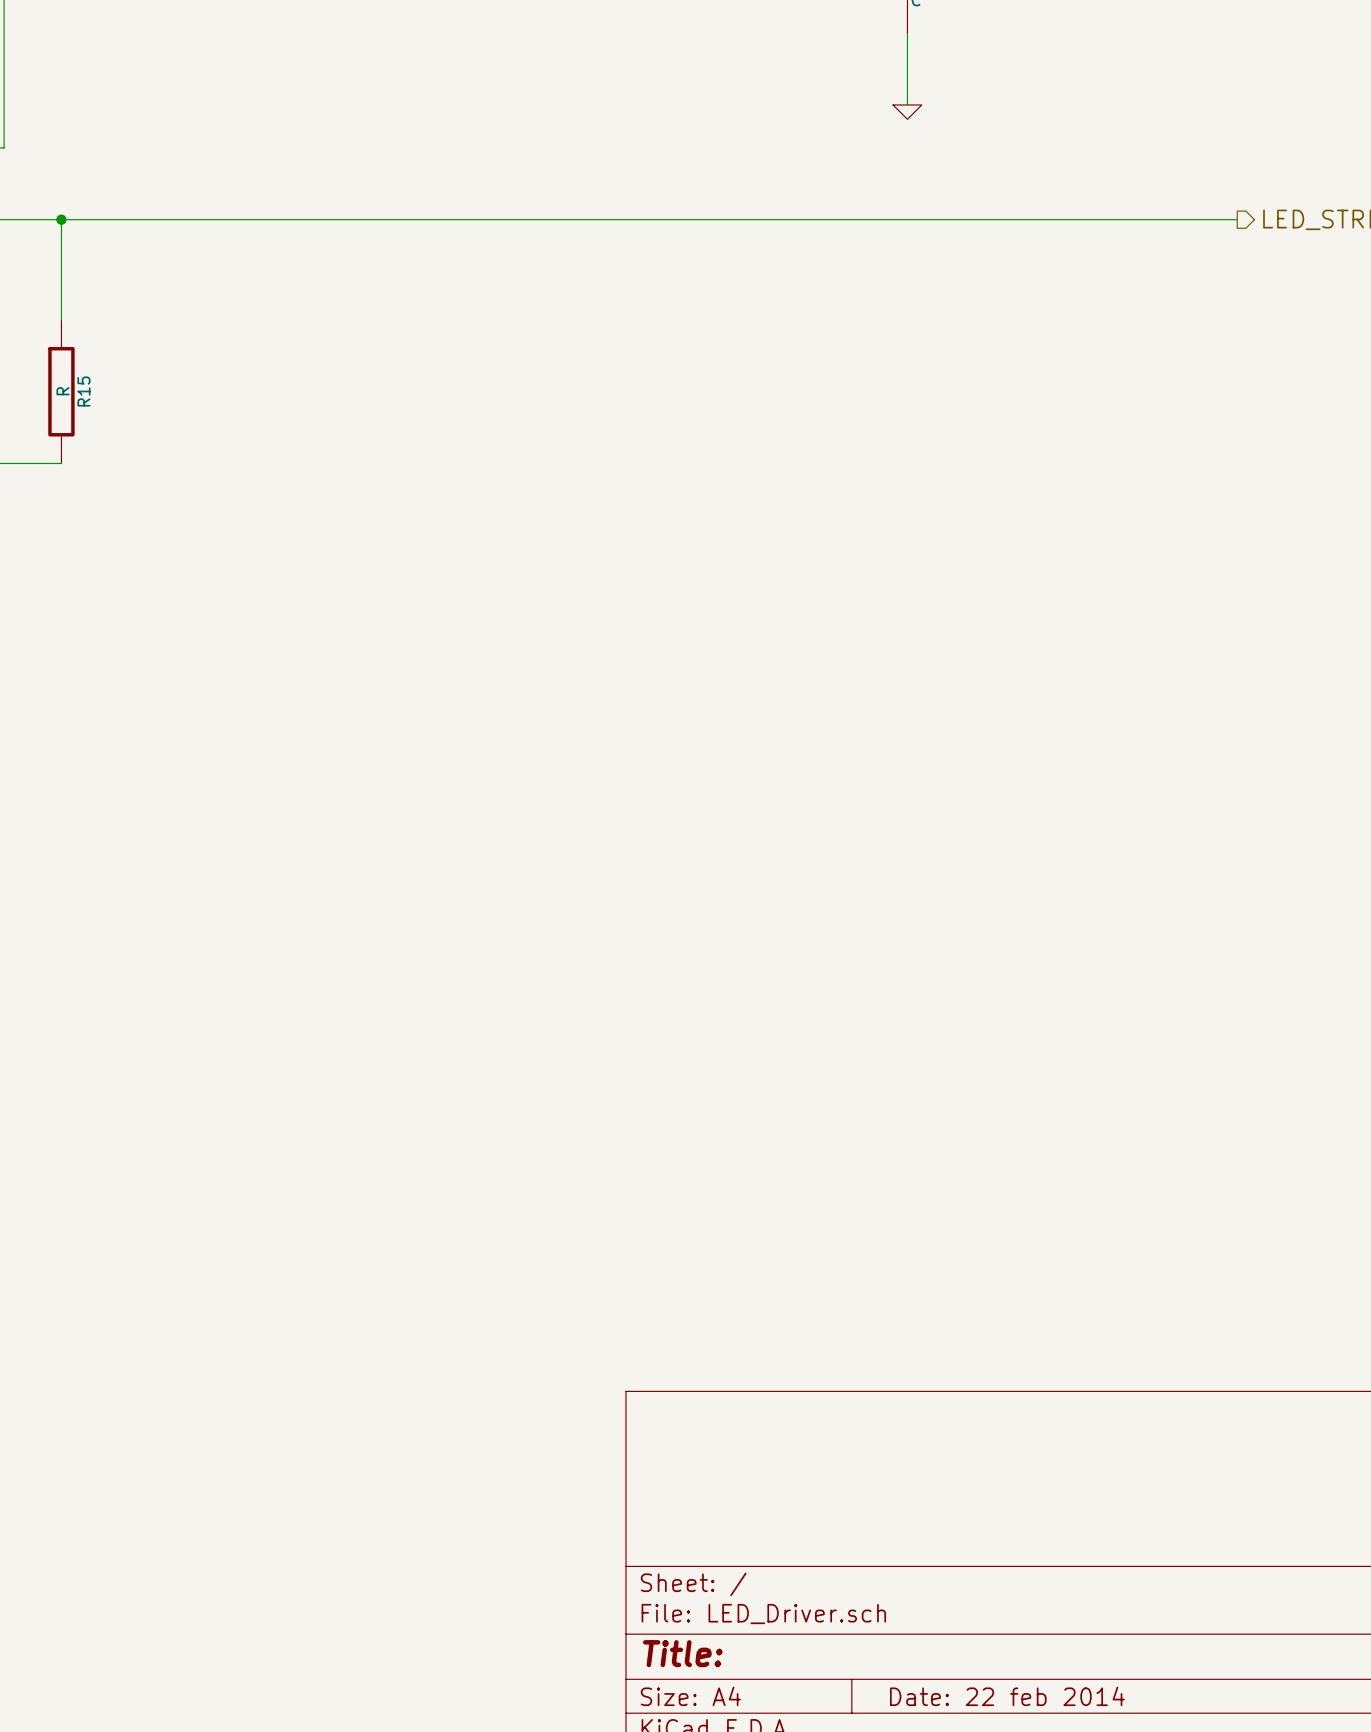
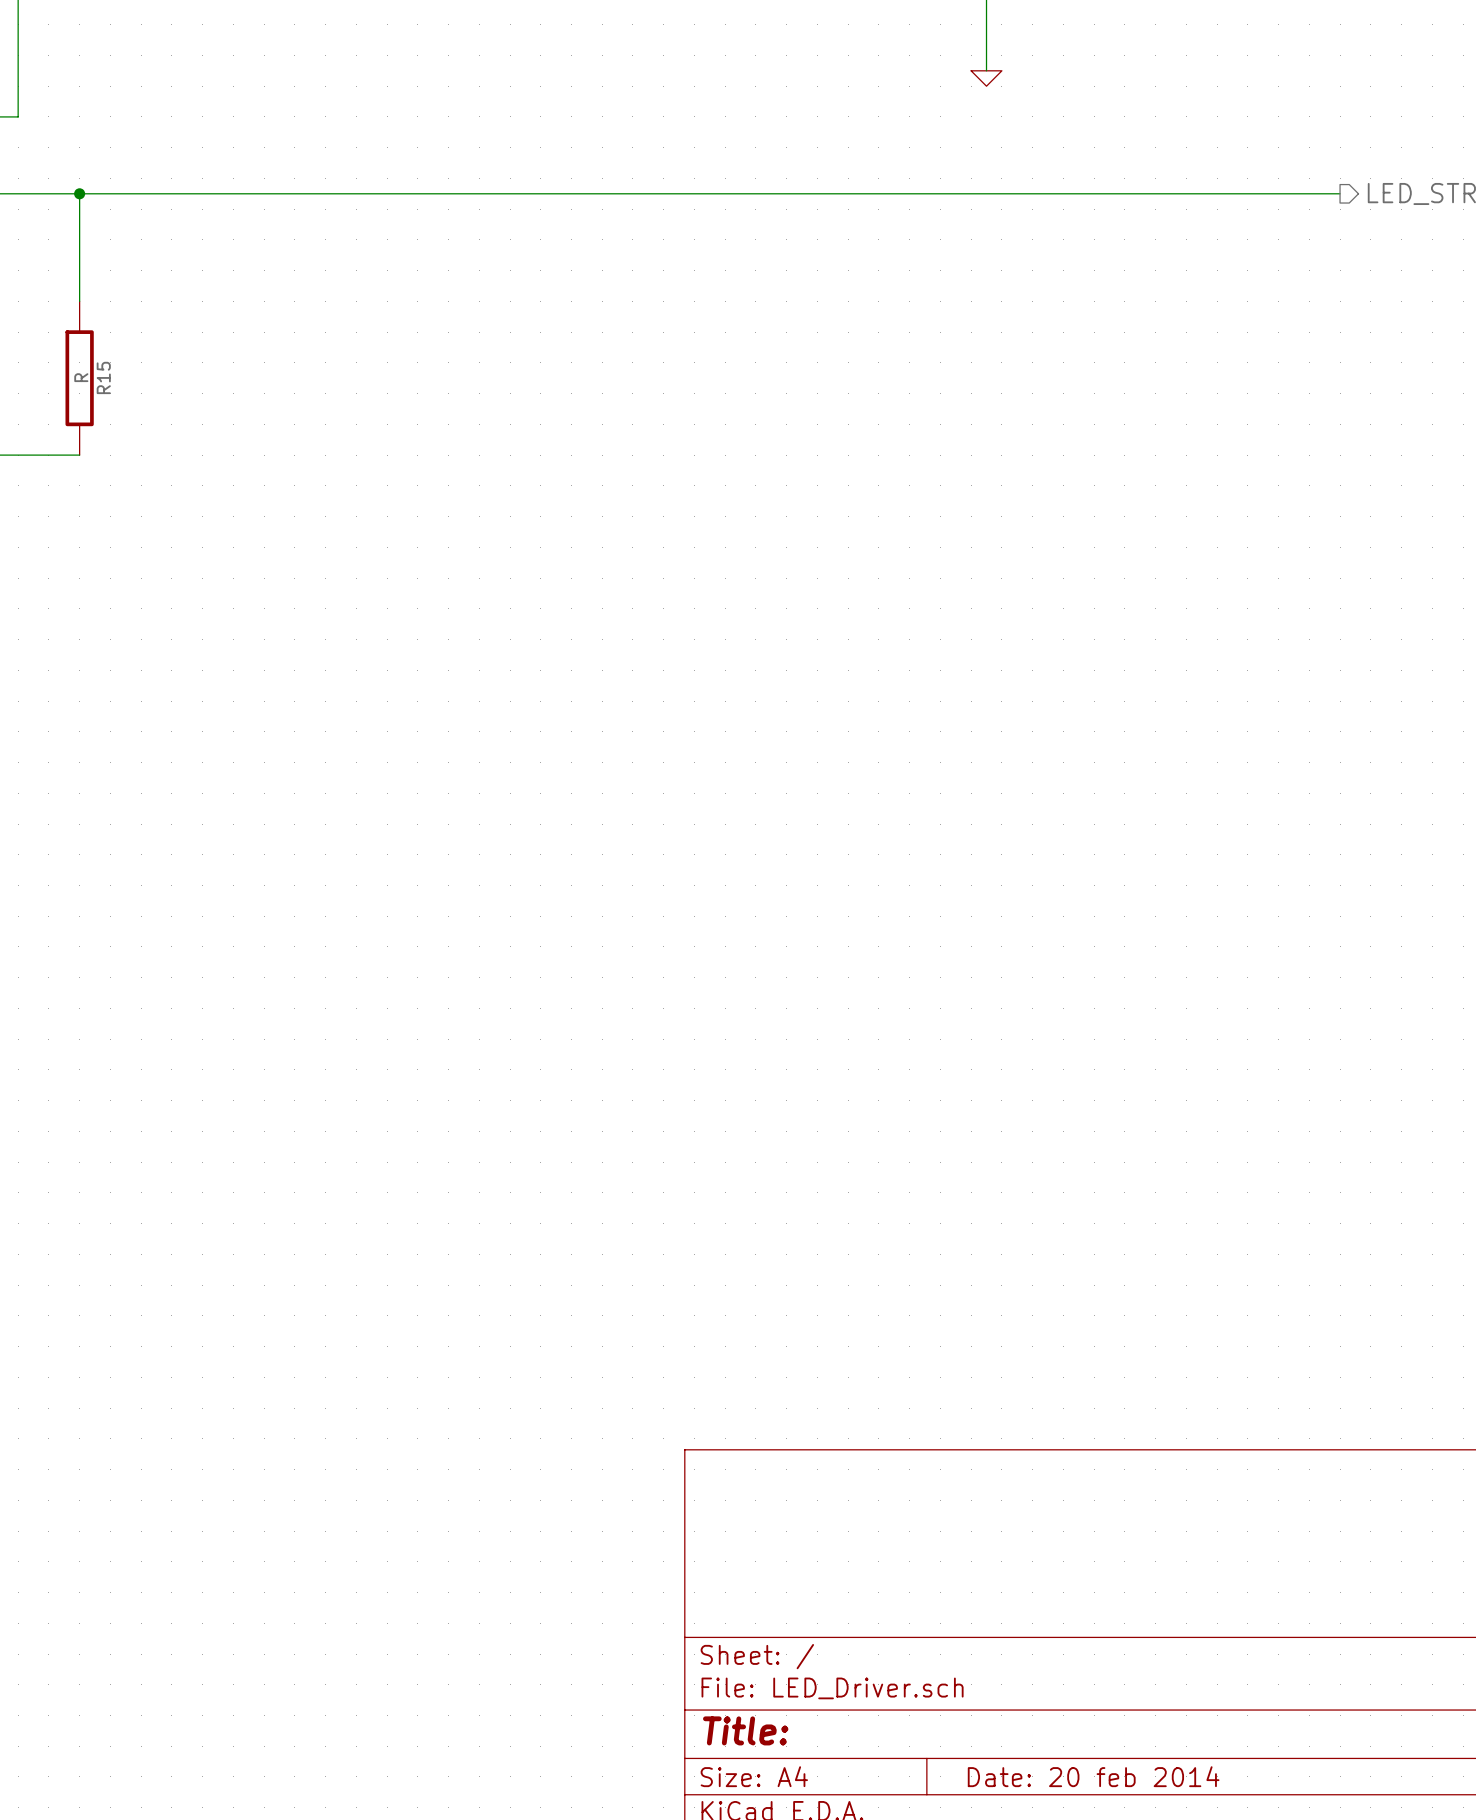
title block: Date: 22 feb 2014 (1007, 1696) -> Date: 20 feb 2014 (1093, 1776)

